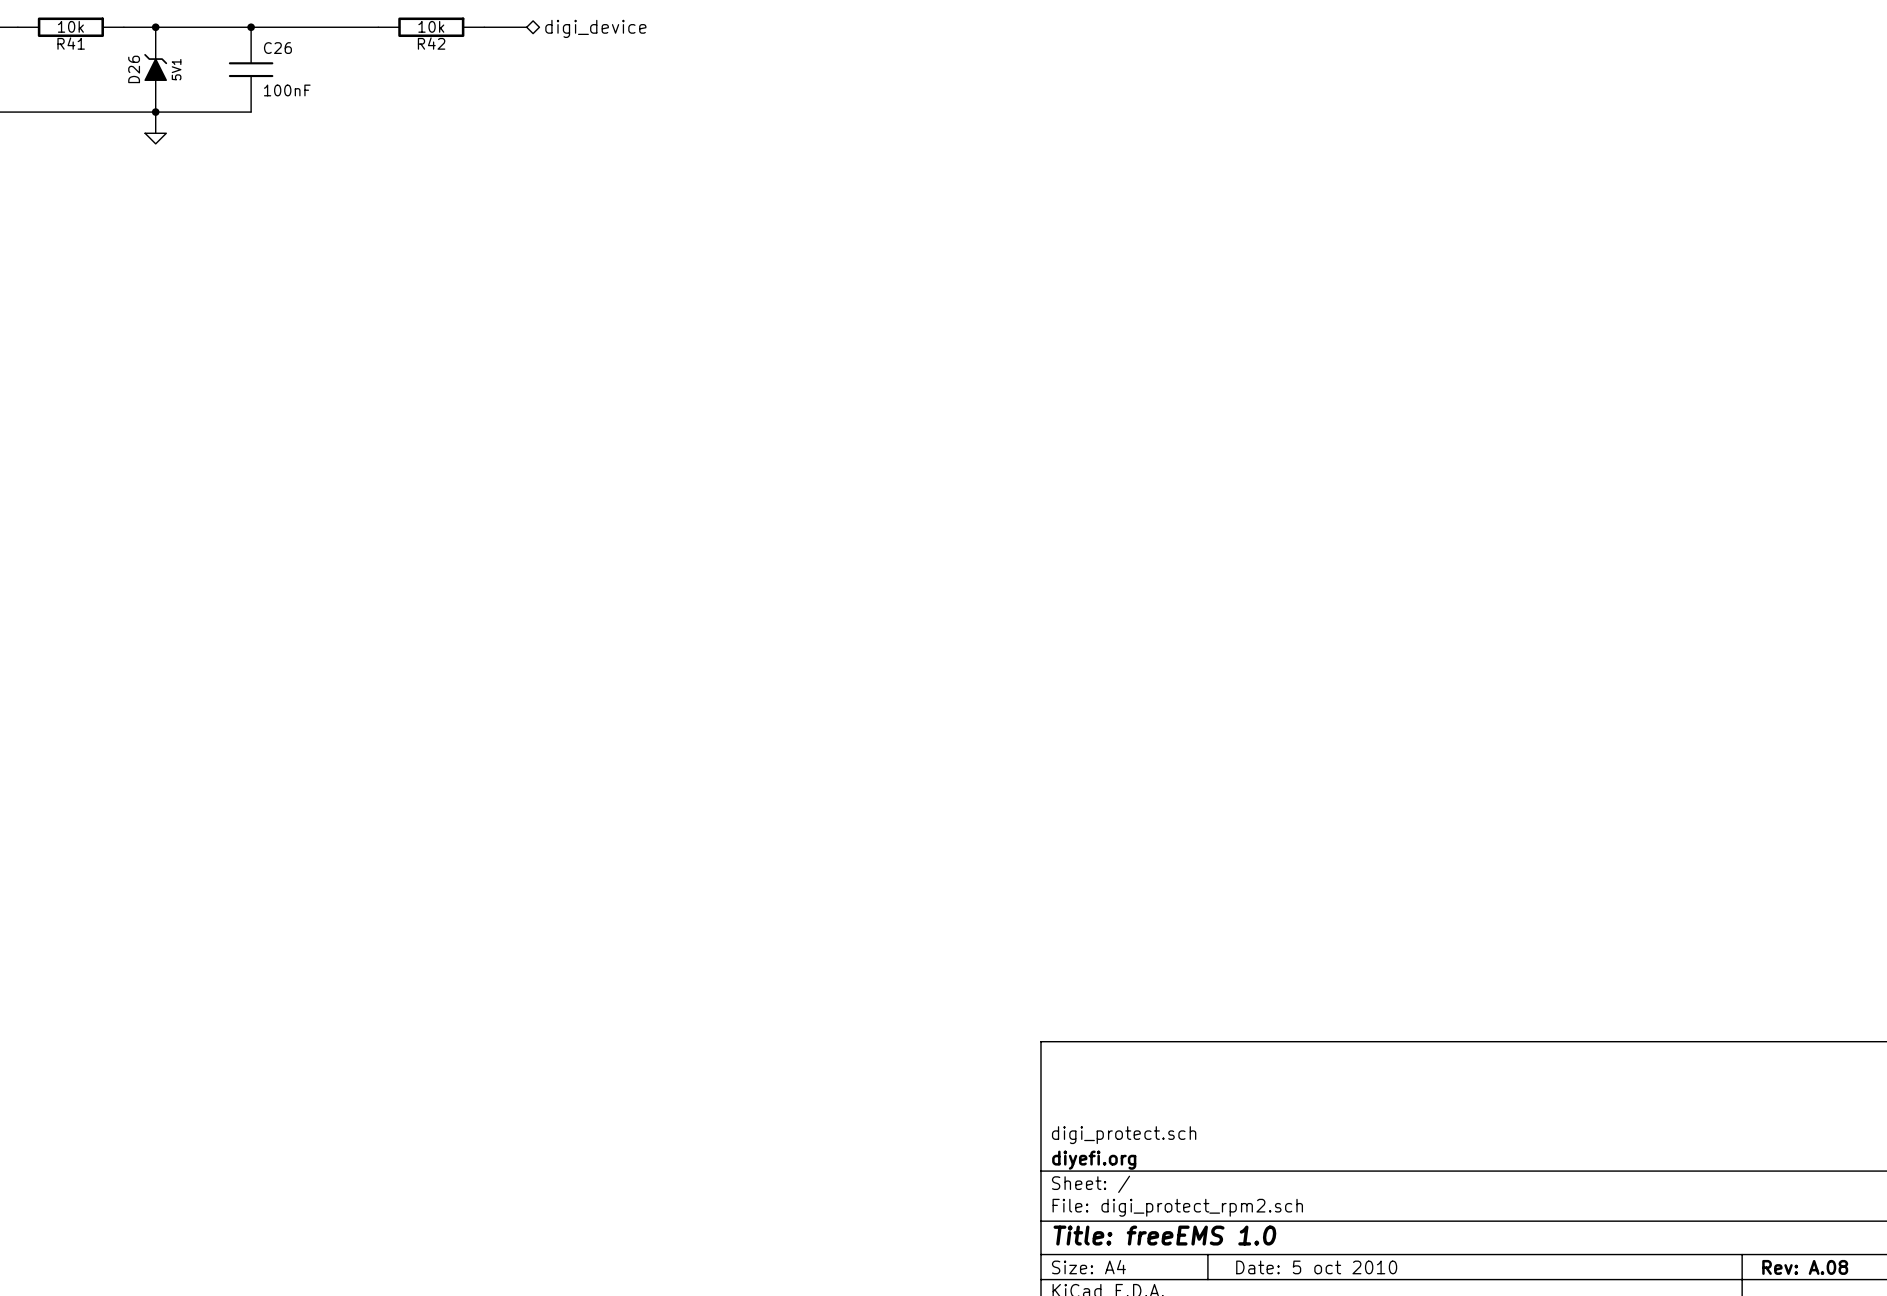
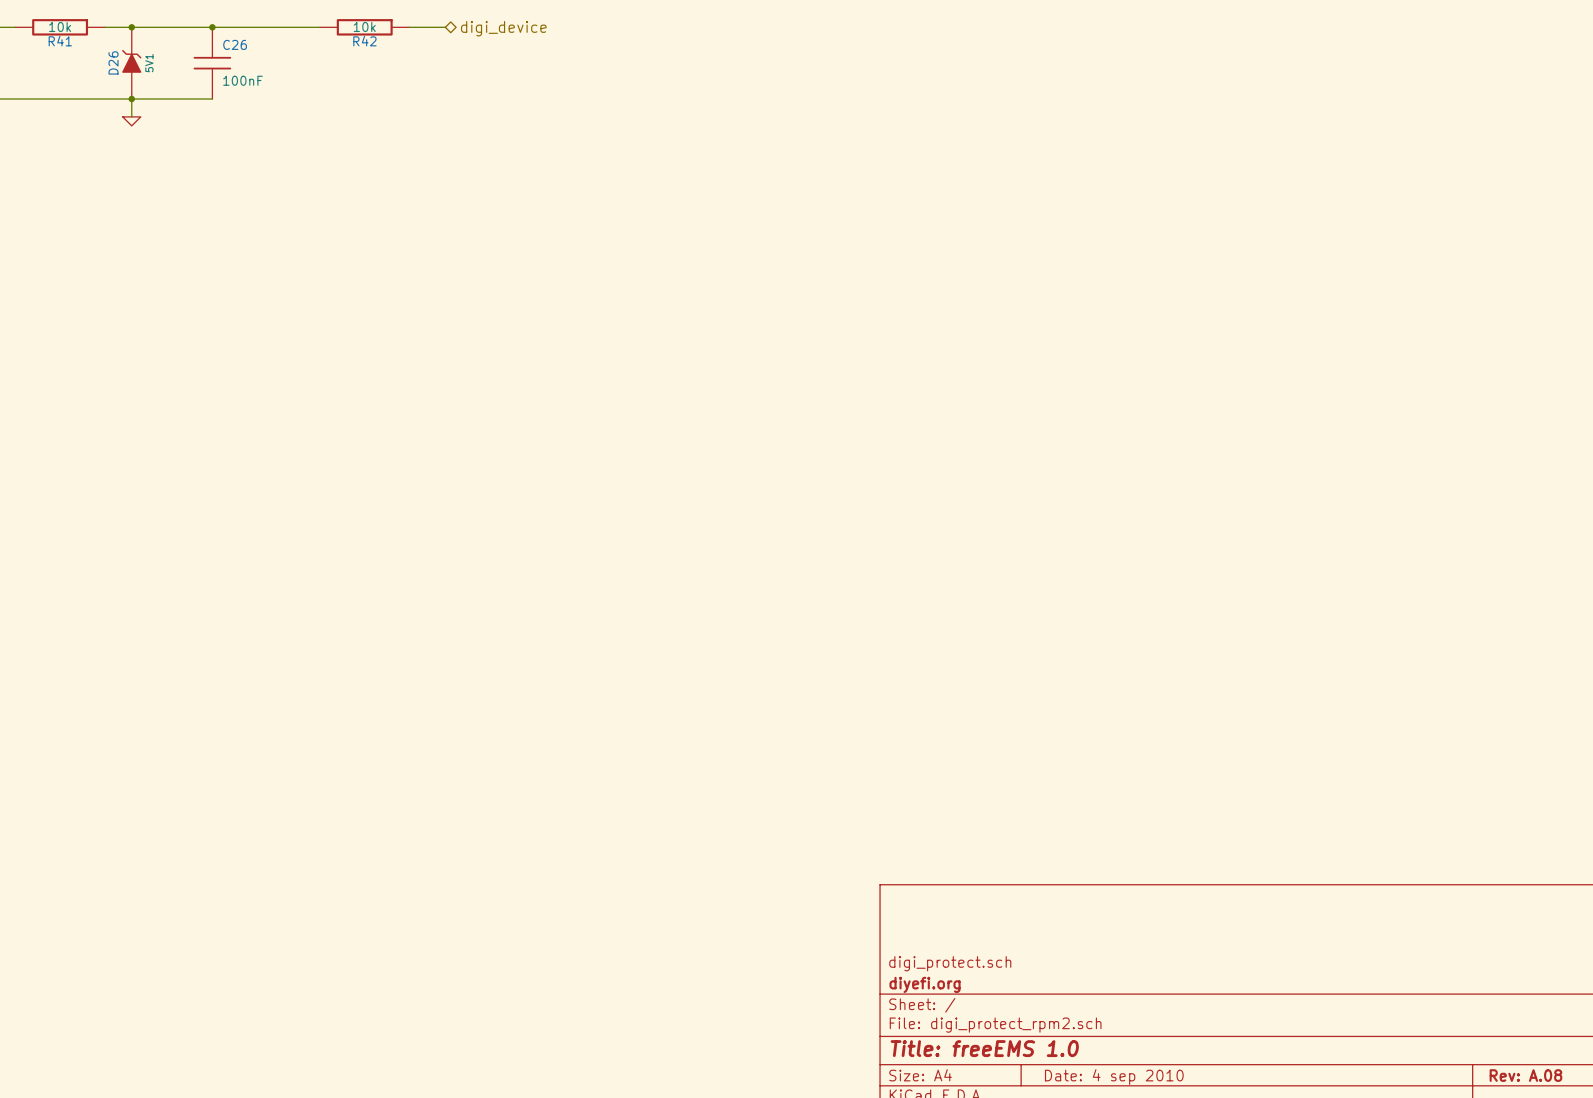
title block: Date: 5 oct 2010 (1316, 1267) -> Date: 4 sep 2010 (1114, 1077)

